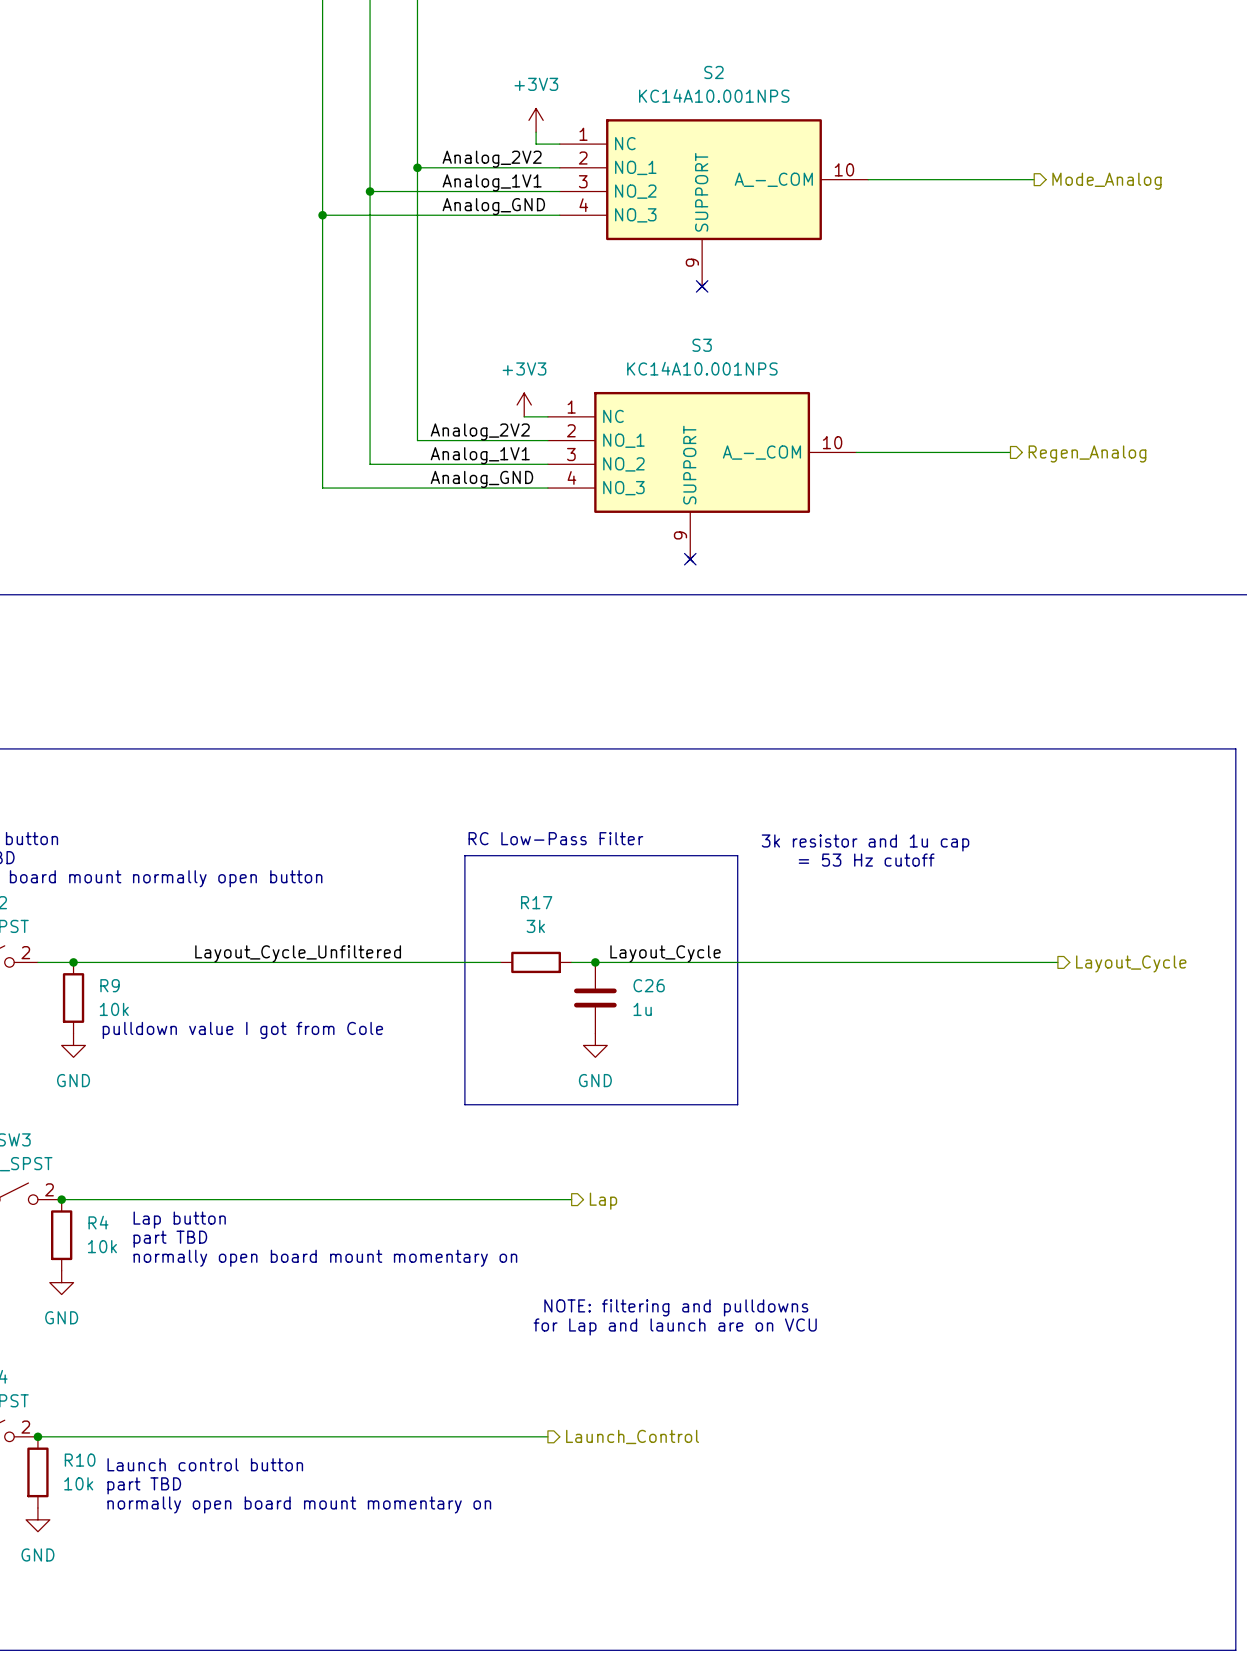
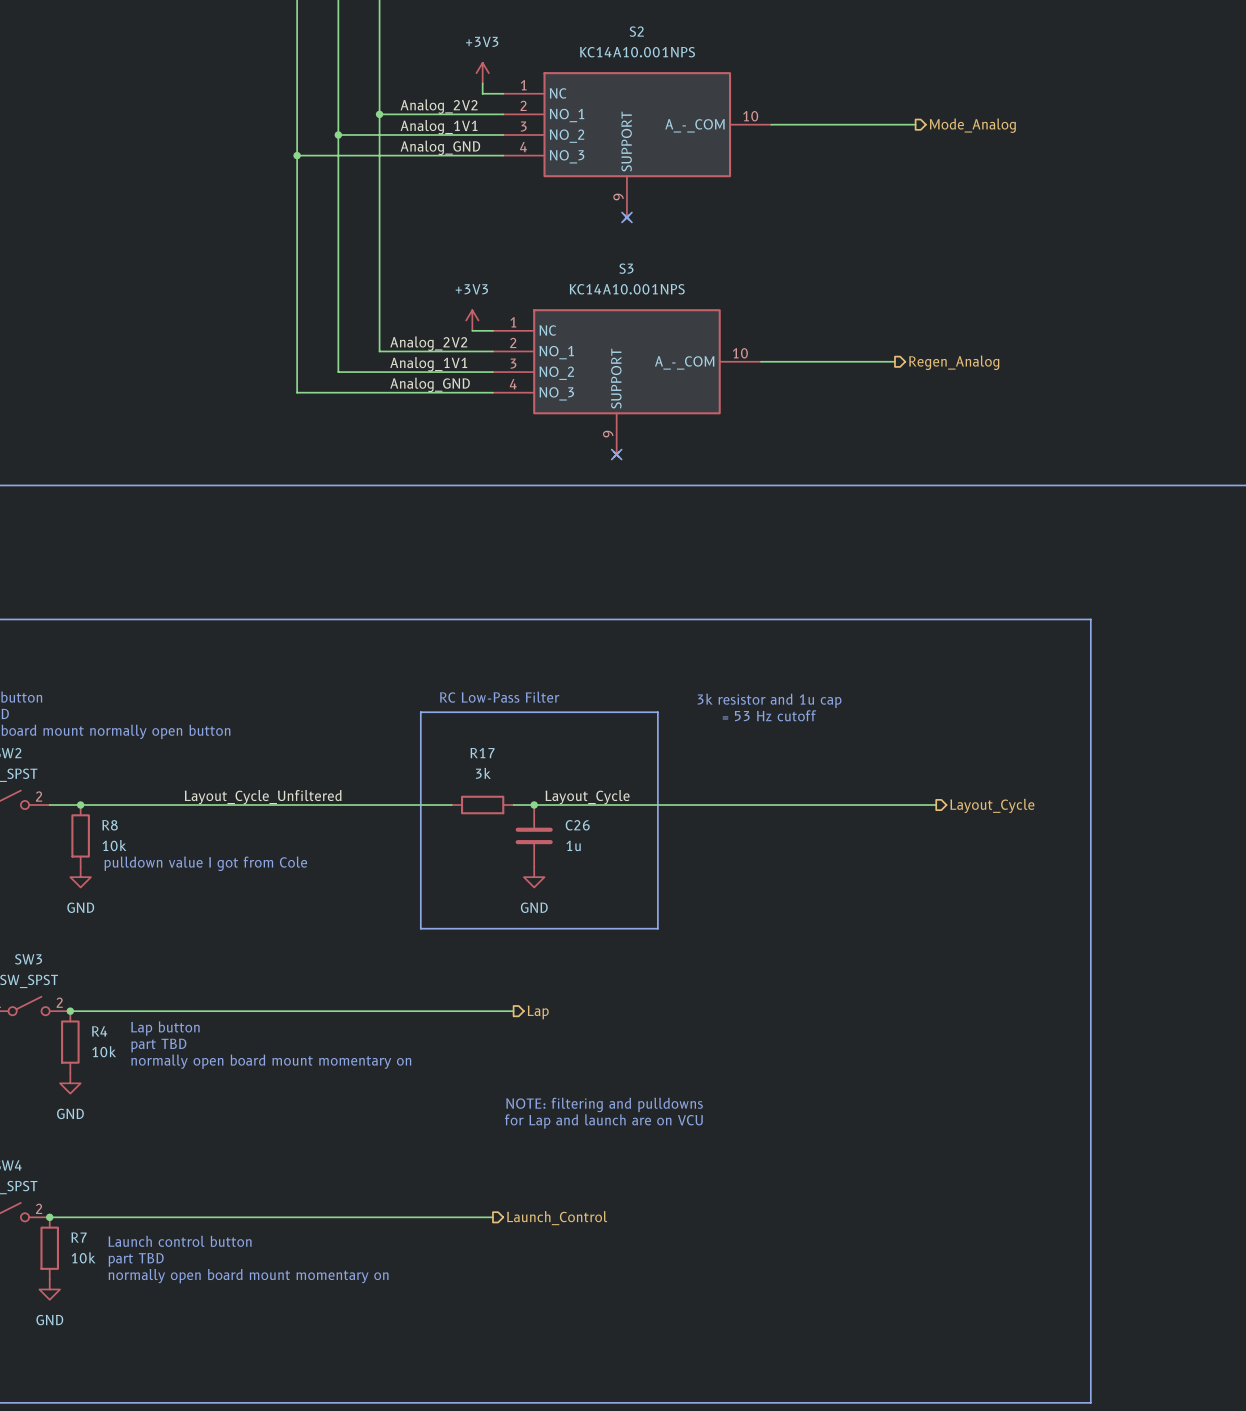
R9 name: R9 (110, 985) -> R8 (110, 825)
R10 name: R10 (80, 1460) -> R7 (79, 1237)

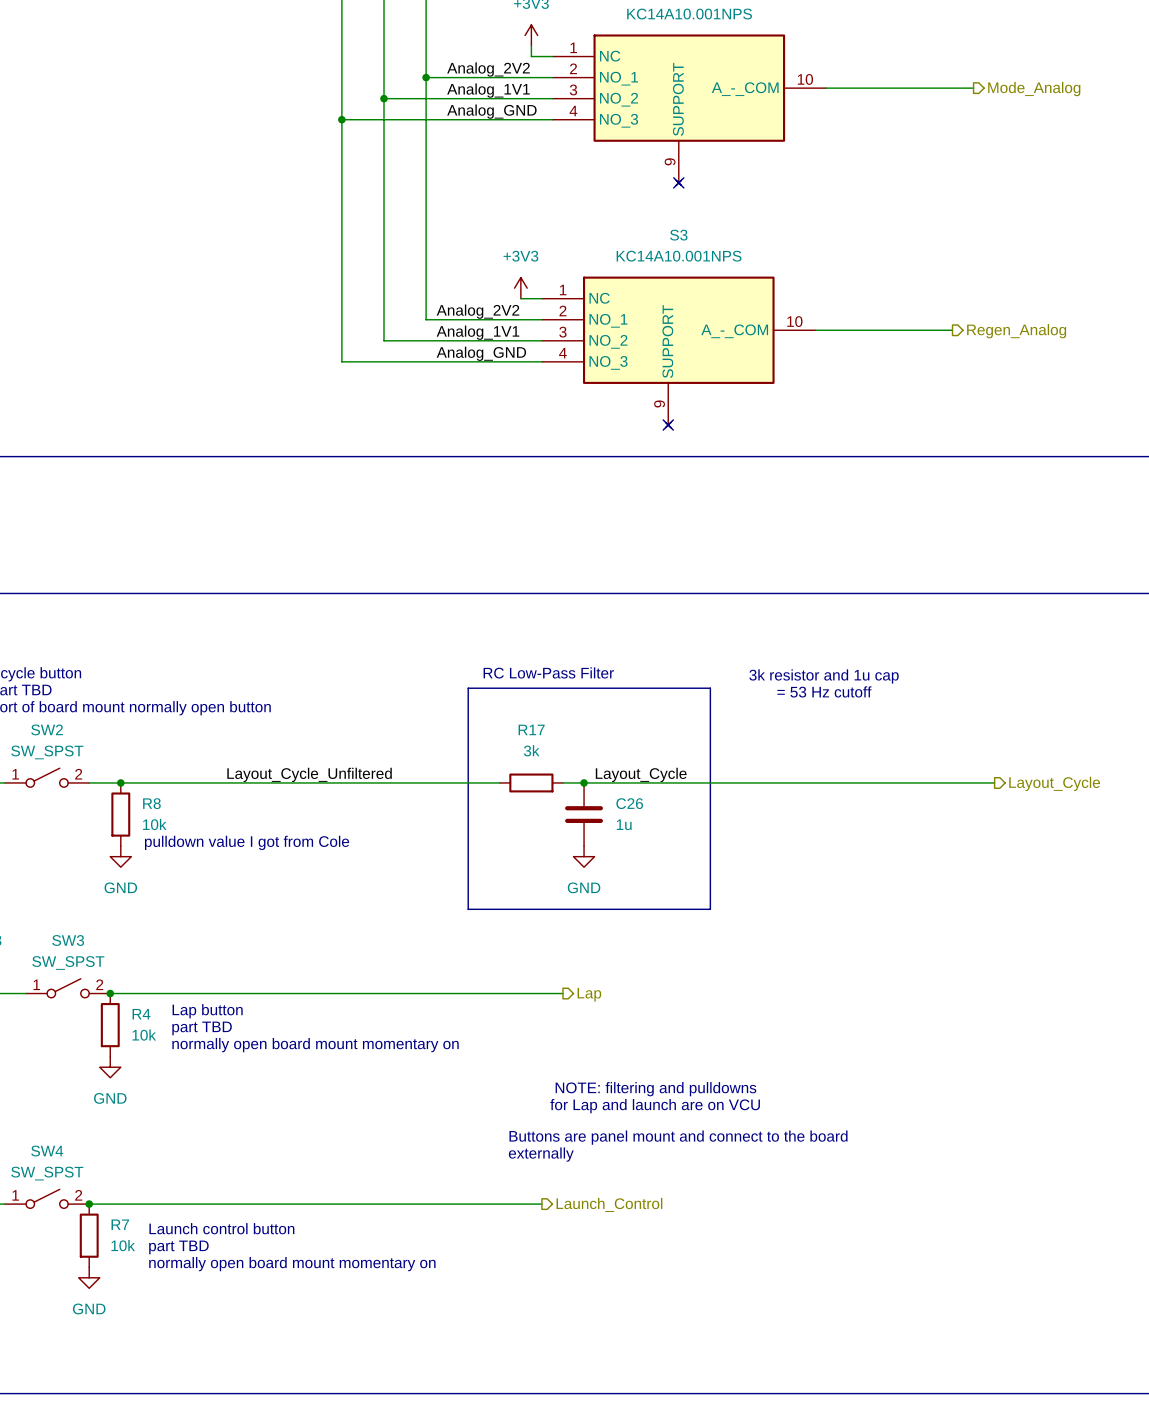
text: none -> Buttons are panel mount and connect to the board (678, 1137)
text: none -> externally (541, 1154)

